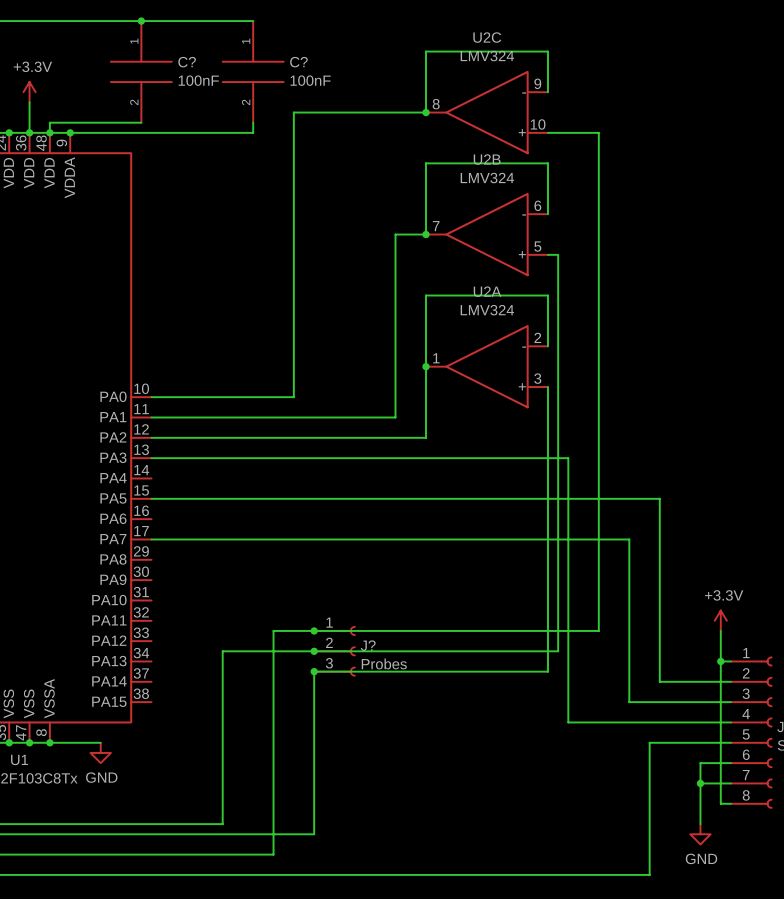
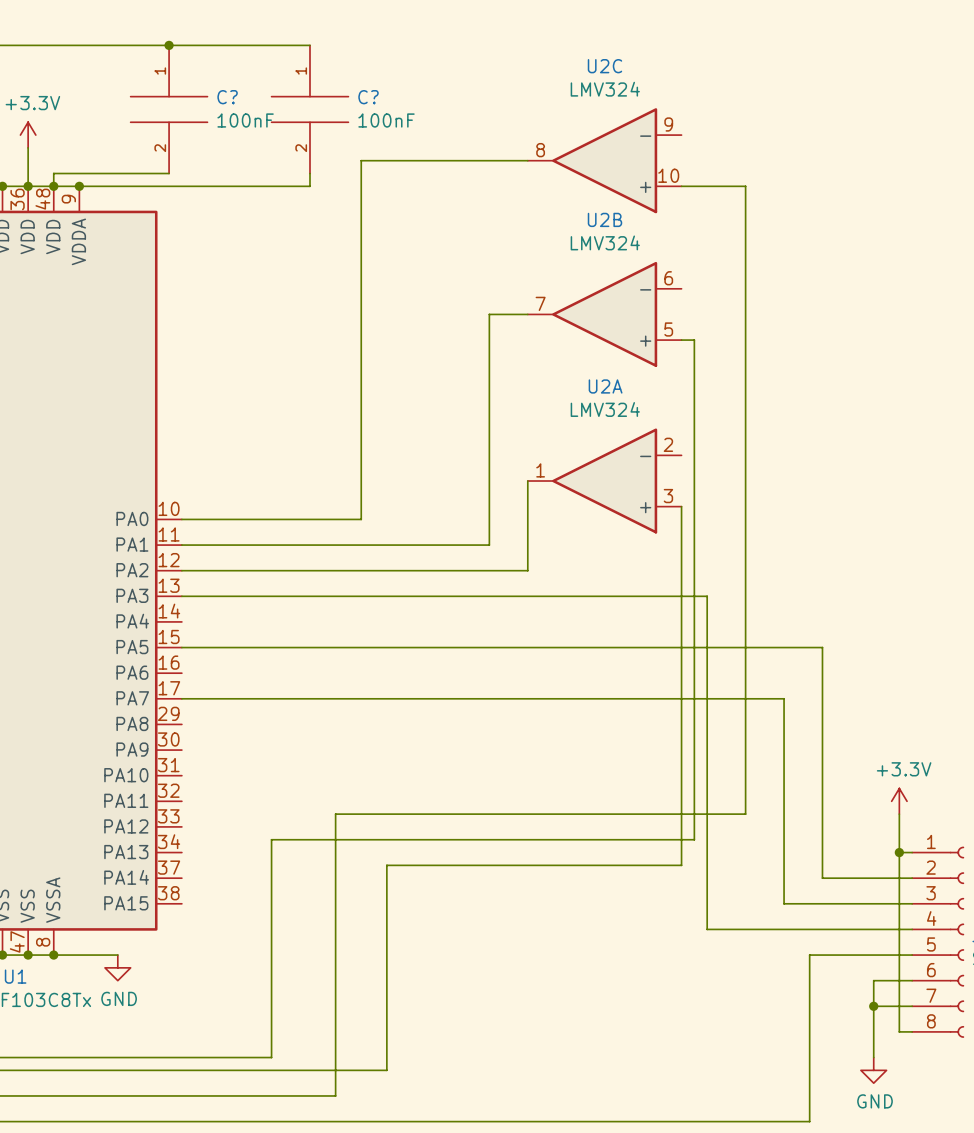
wire: (547, 92) (547, 51) (426, 51) (426, 112) -> none
junction: (426, 112) -> none
wire: (547, 214) (547, 163) (426, 163) (426, 234) -> none
junction: (426, 234) -> none
wire: (547, 346) (547, 295) (426, 295) (426, 366) -> none
junction: (426, 366) -> none
junction: (314, 630) -> none
junction: (314, 651) -> none
J?: Probes (334, 651) -> none
junction: (314, 671) -> none

